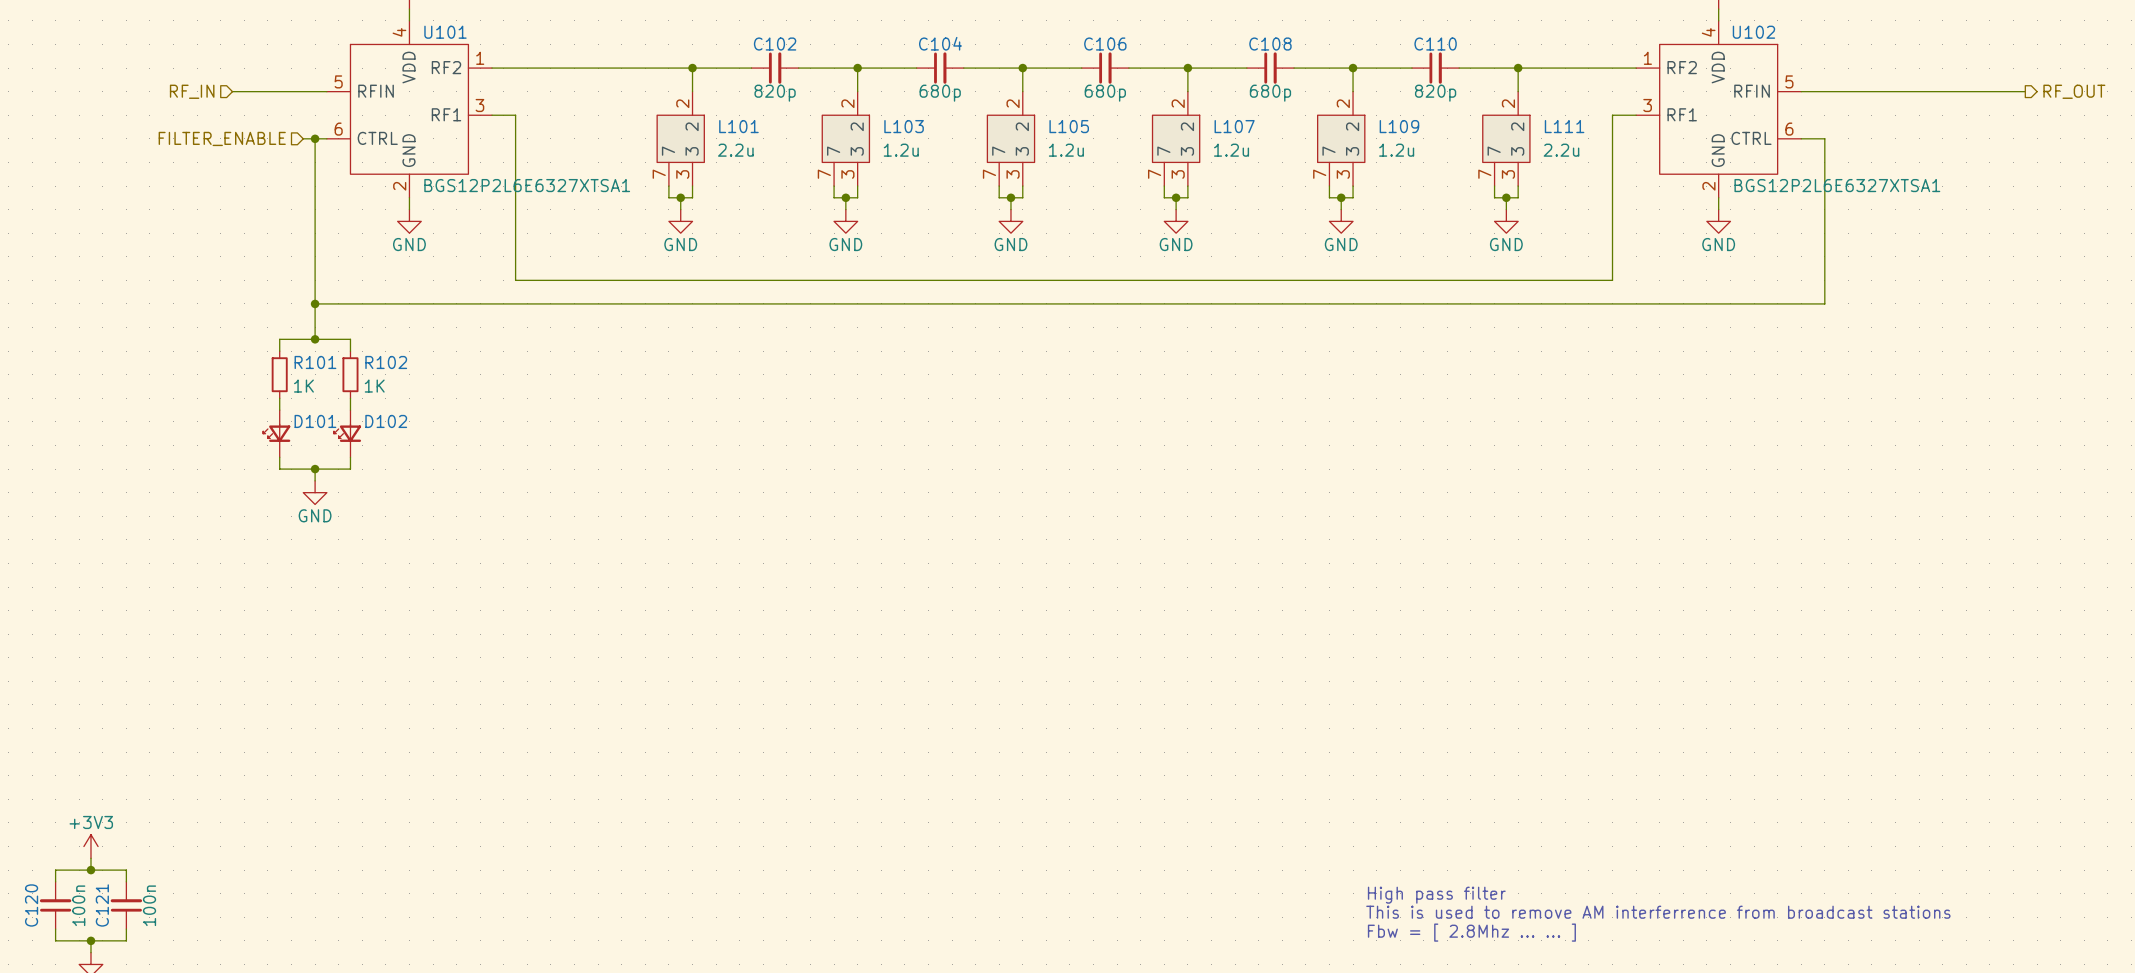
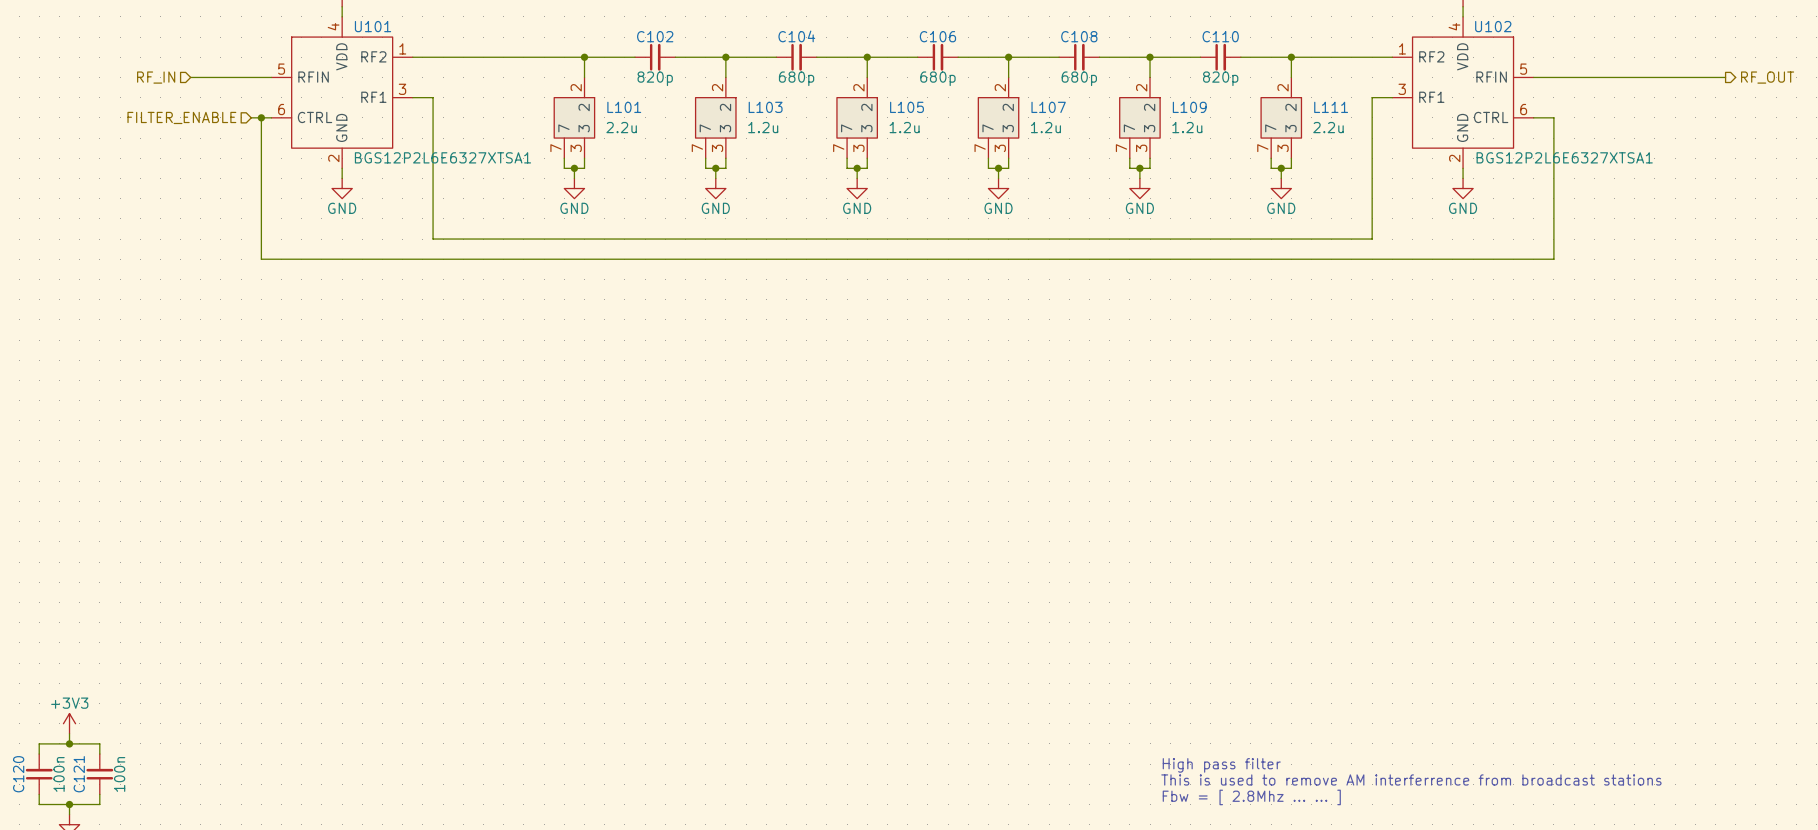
wire: (315, 303) (315, 339) -> none
junction: (315, 303) -> none
junction: (315, 339) -> none
wire: (279, 351) (279, 339) (350, 339) (350, 351) -> none
R101: 1K (279, 374) -> none
R102: 1K (350, 374) -> none
wire: (279, 398) (279, 410) -> none
wire: (350, 398) (350, 410) -> none
D101: (276, 433) -> none
D102: (347, 433) -> none
wire: (279, 457) (279, 469) (350, 469) (350, 457) -> none
wire: (315, 469) (315, 480) -> none
junction: (315, 469) -> none
power symbol: GND (315, 492) -> none

